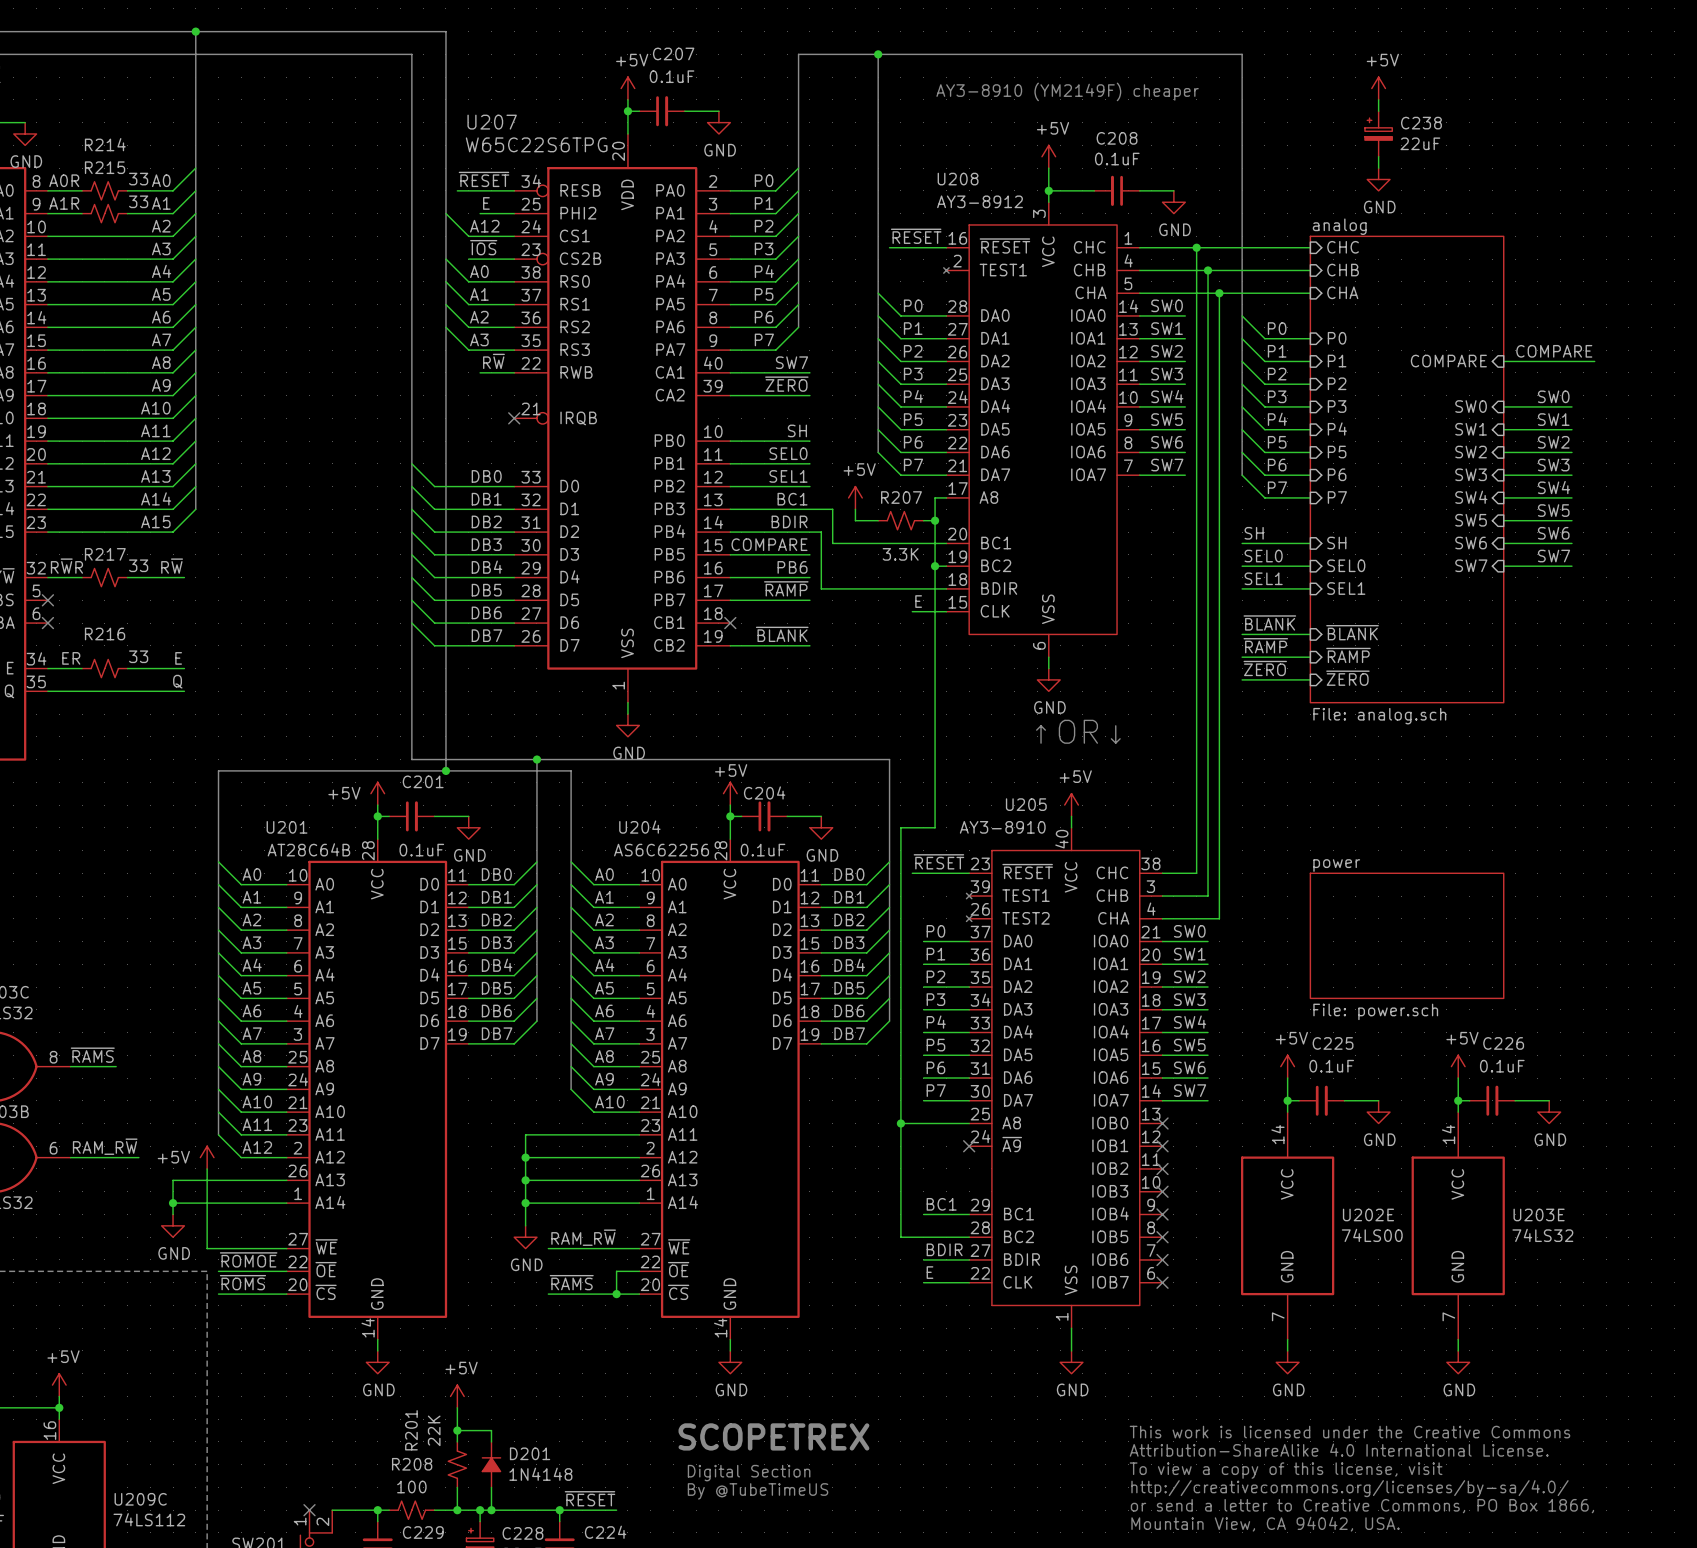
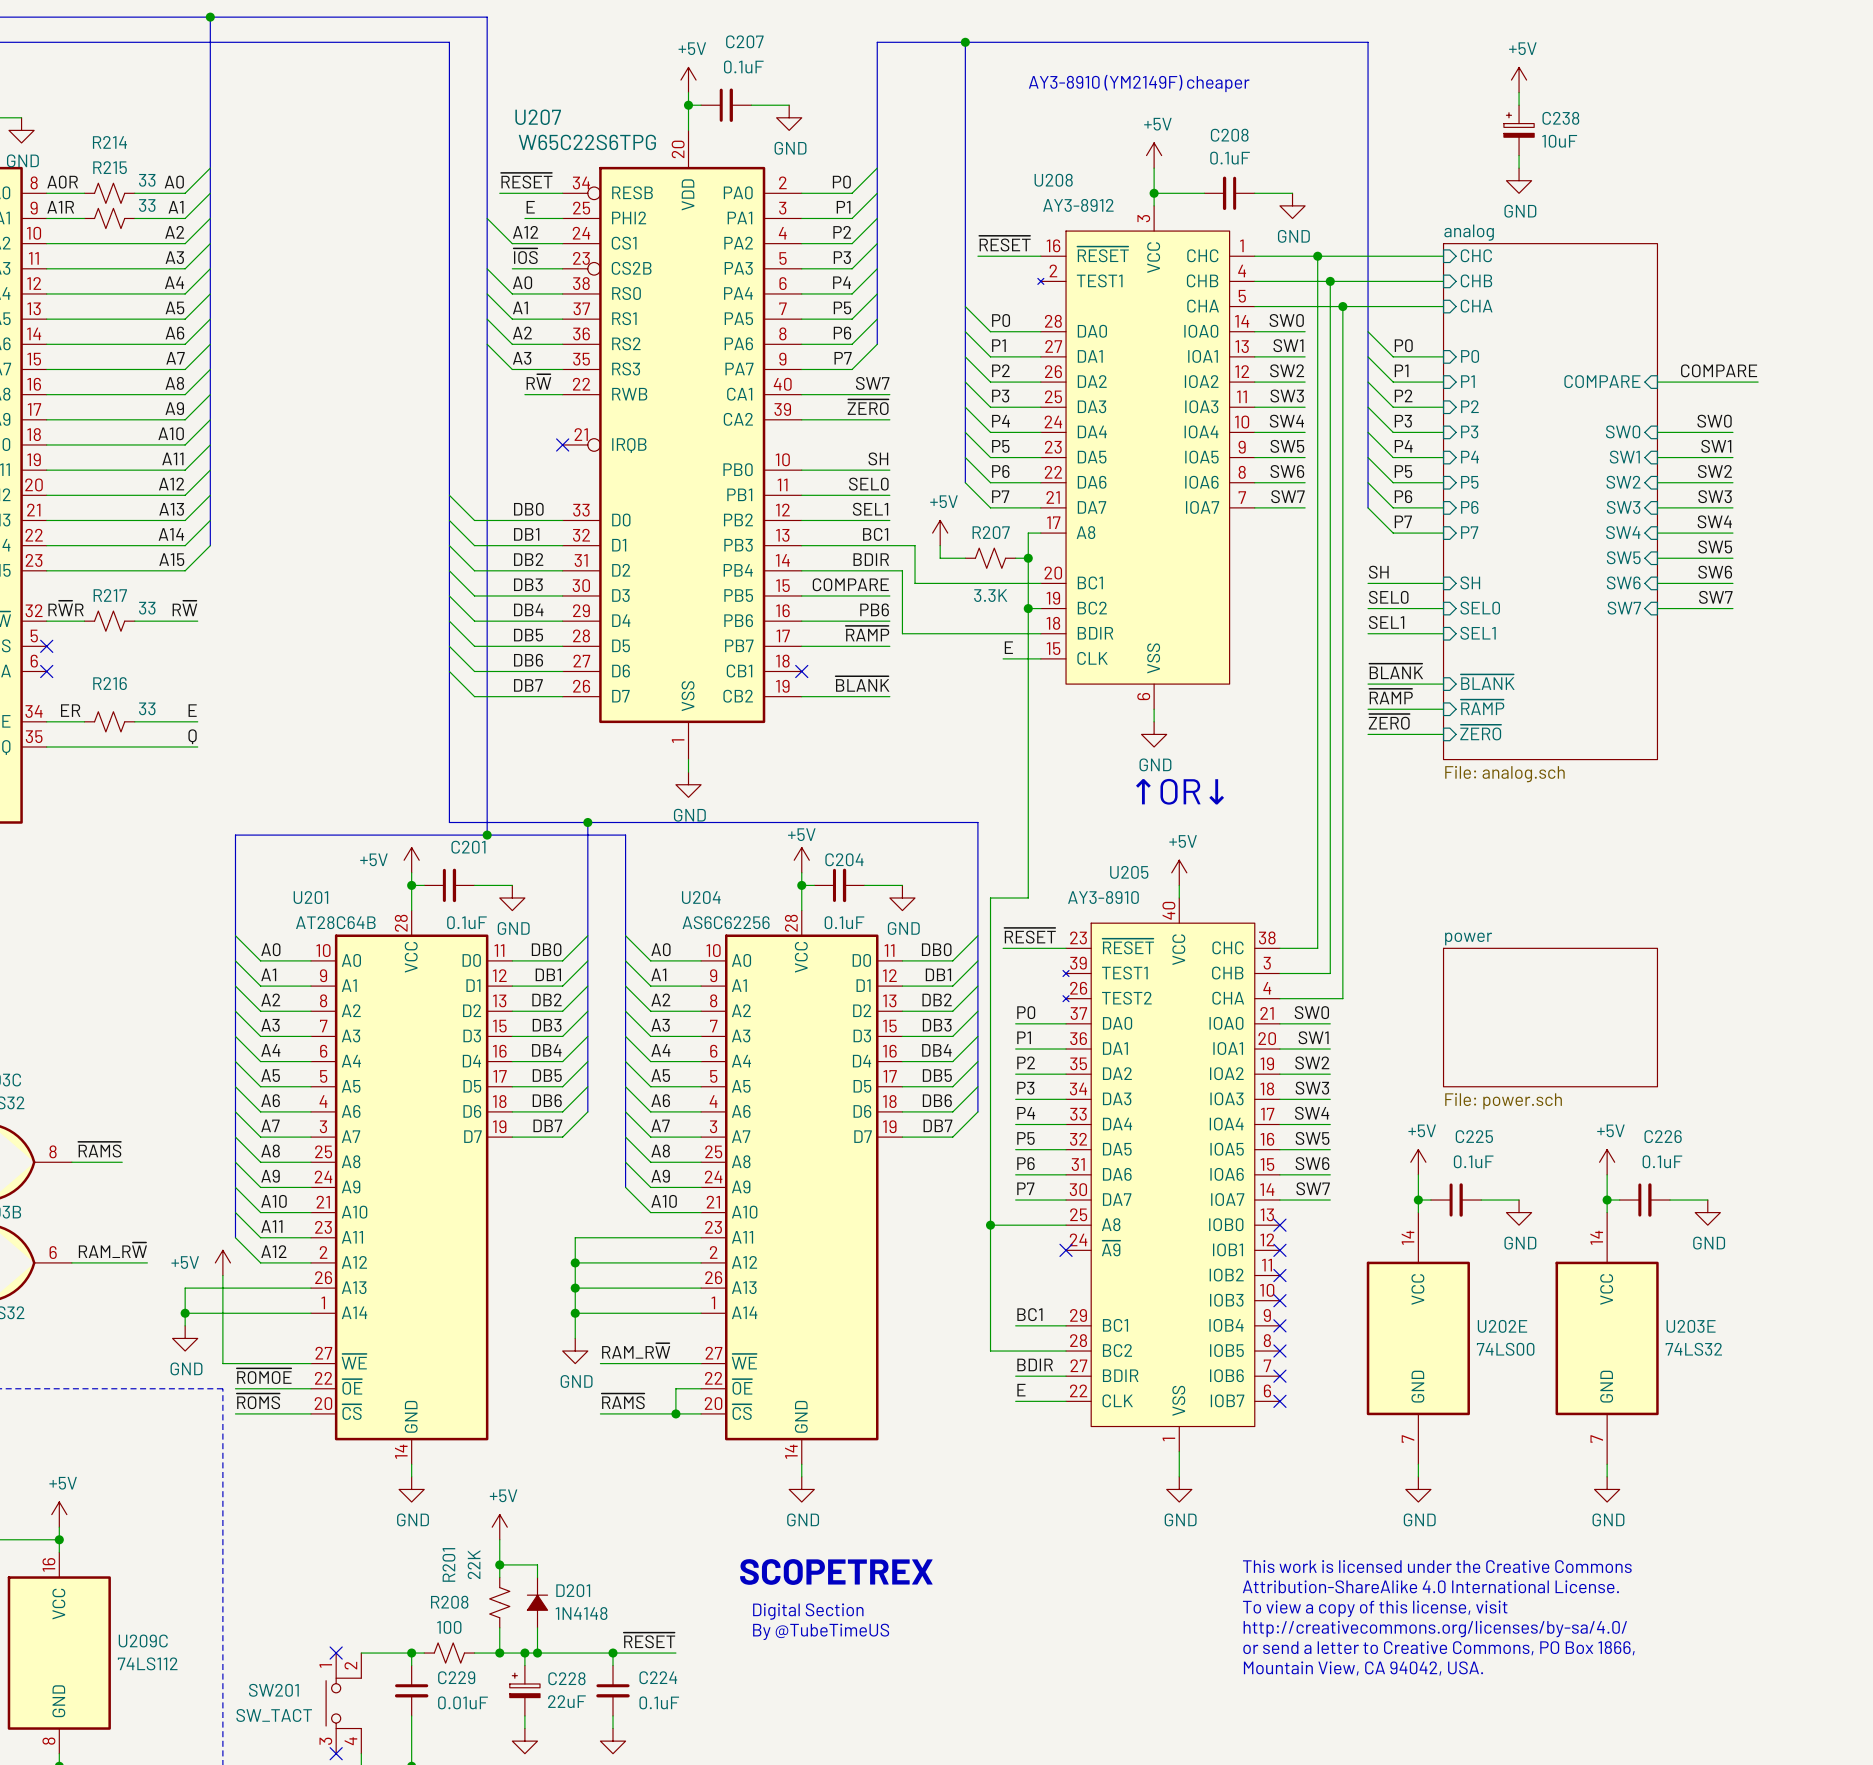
C238 value: 22uF (1420, 143) -> 10uF (1559, 141)

